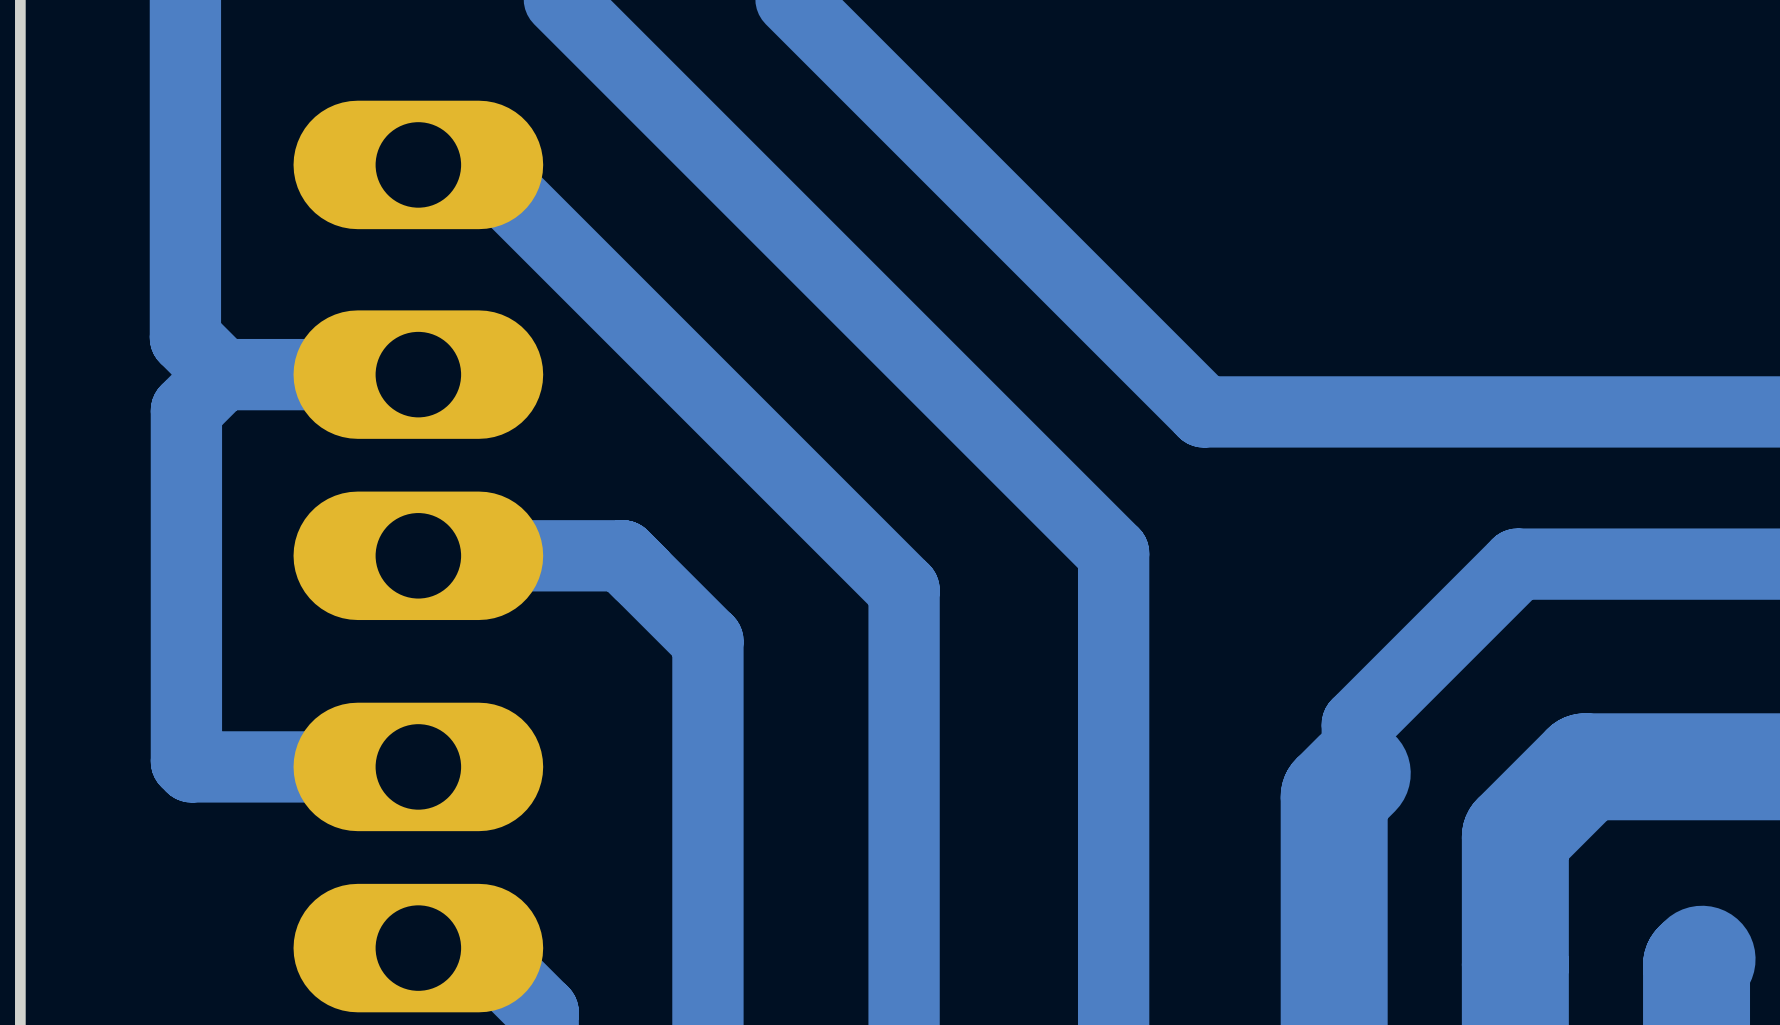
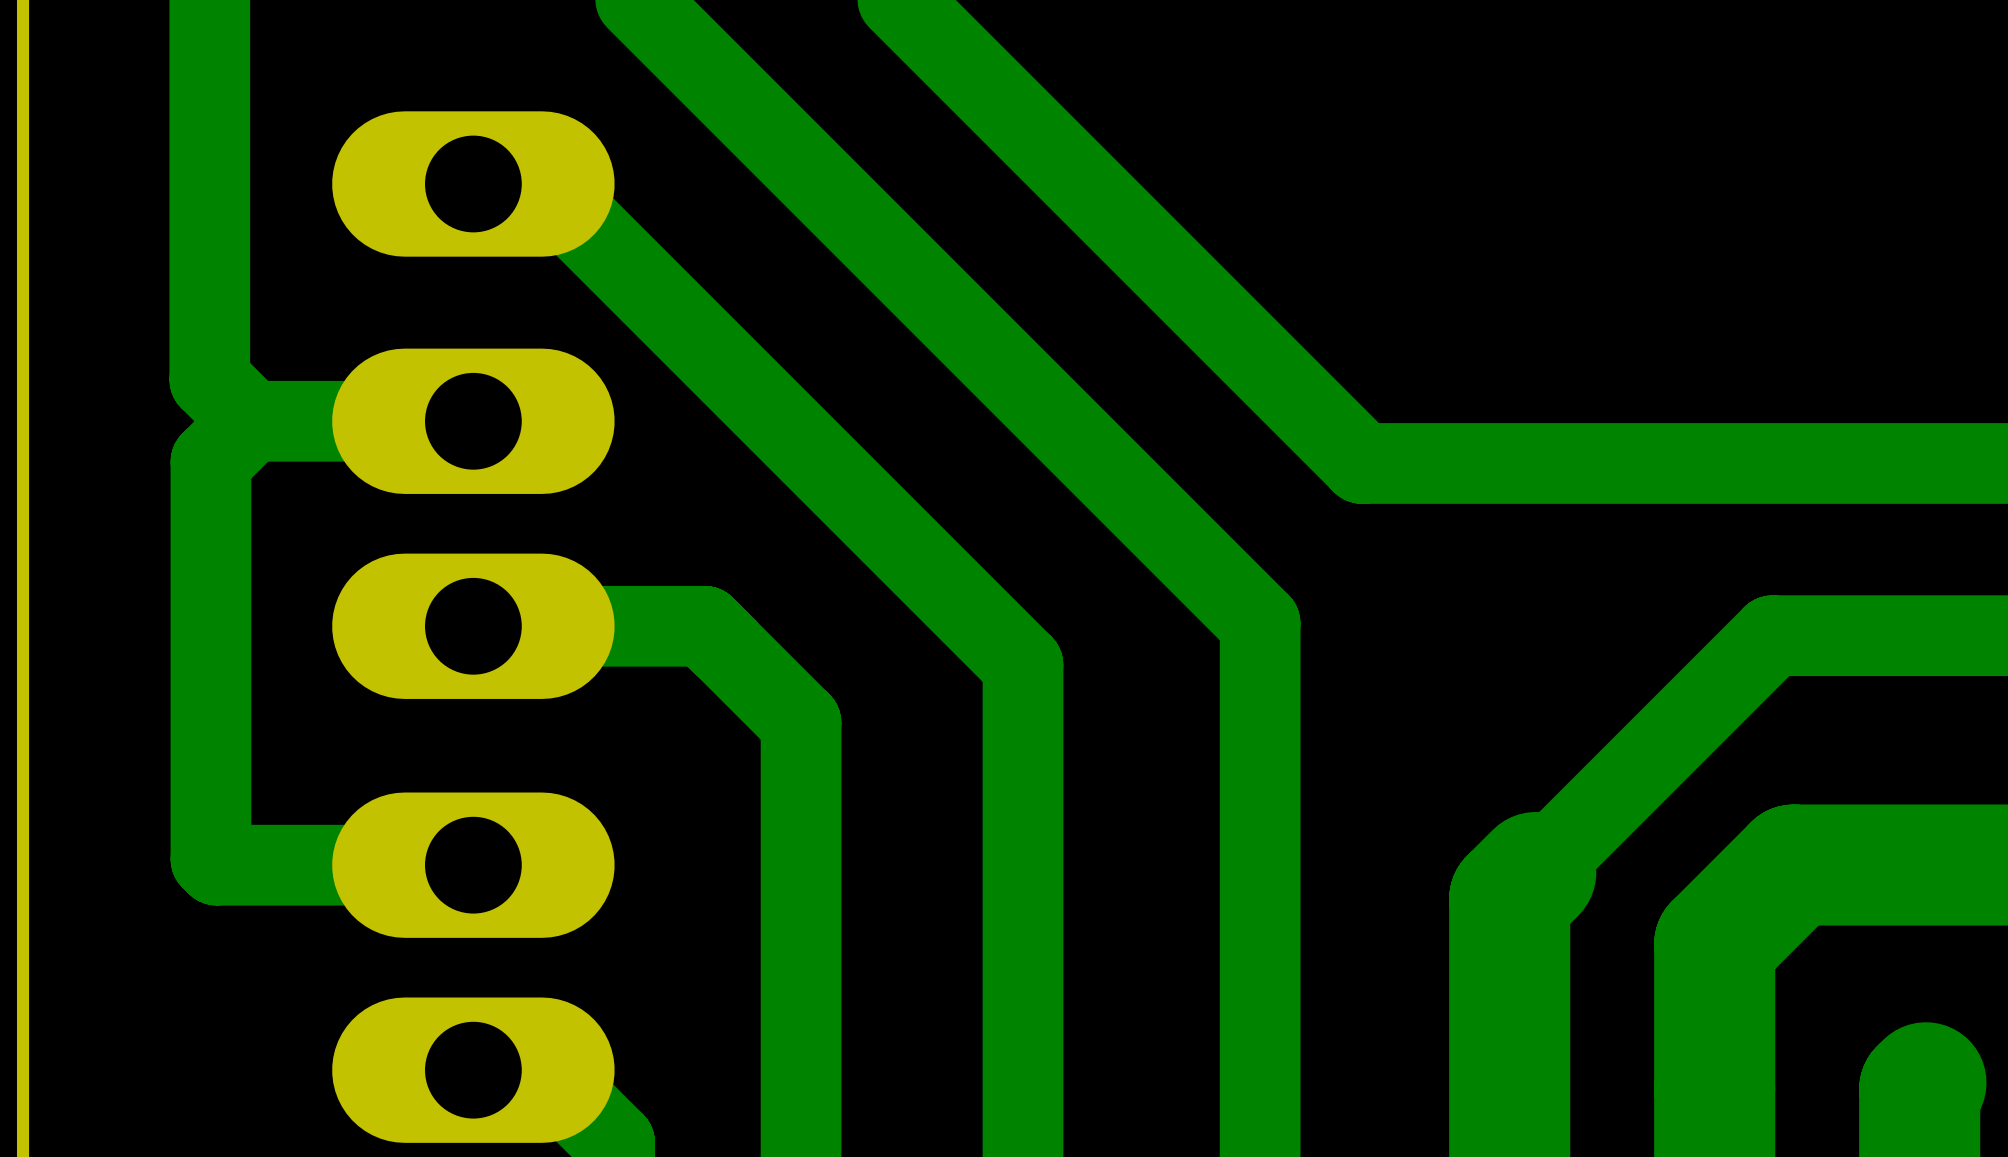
track: (1566, 564) (1517, 564) (1357, 724) (1357, 773) -> (1772, 635) (1535, 872)

